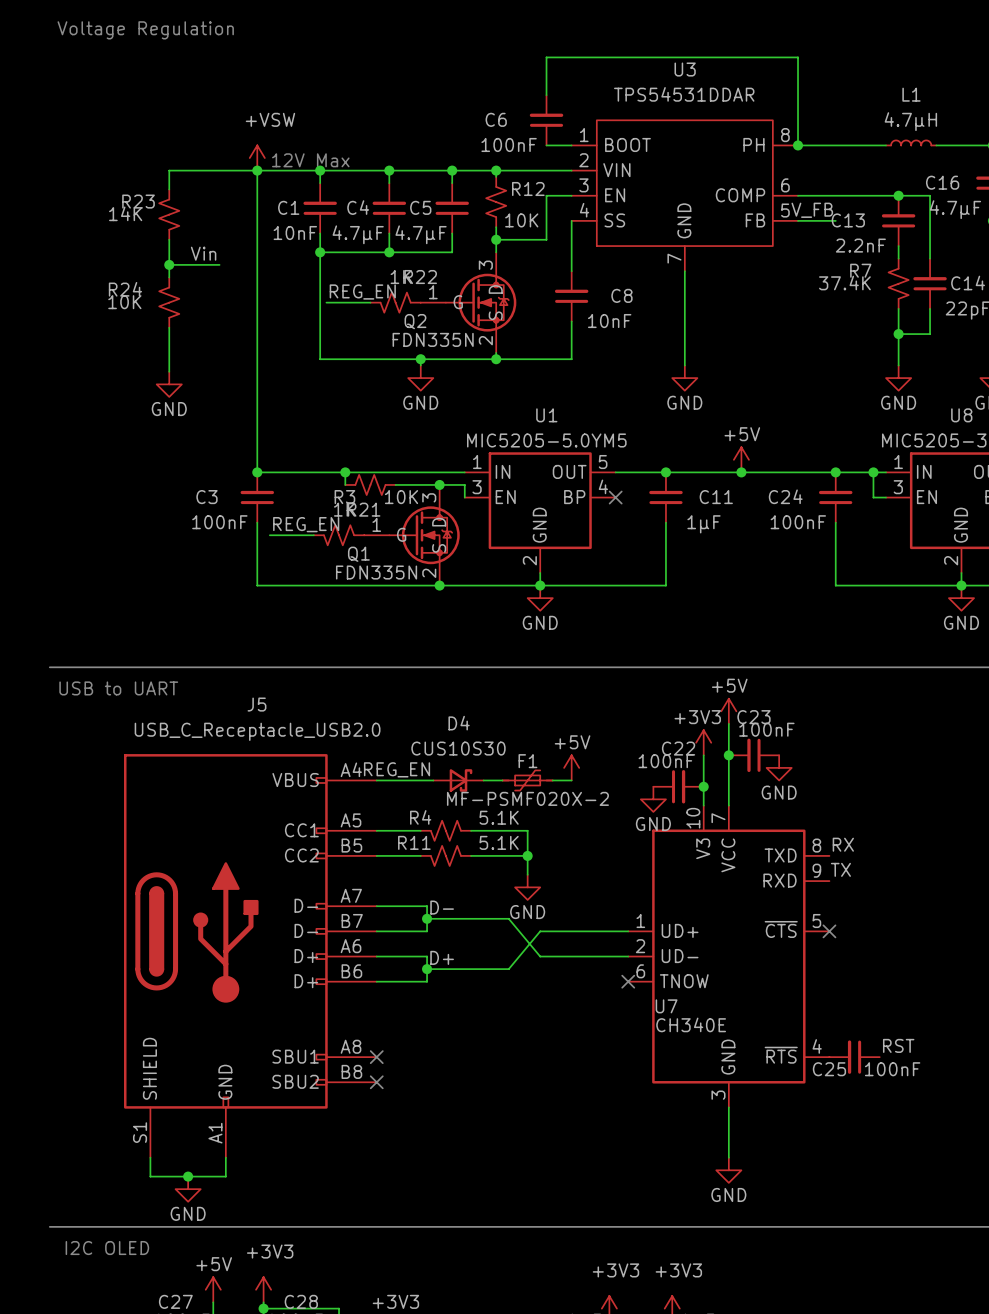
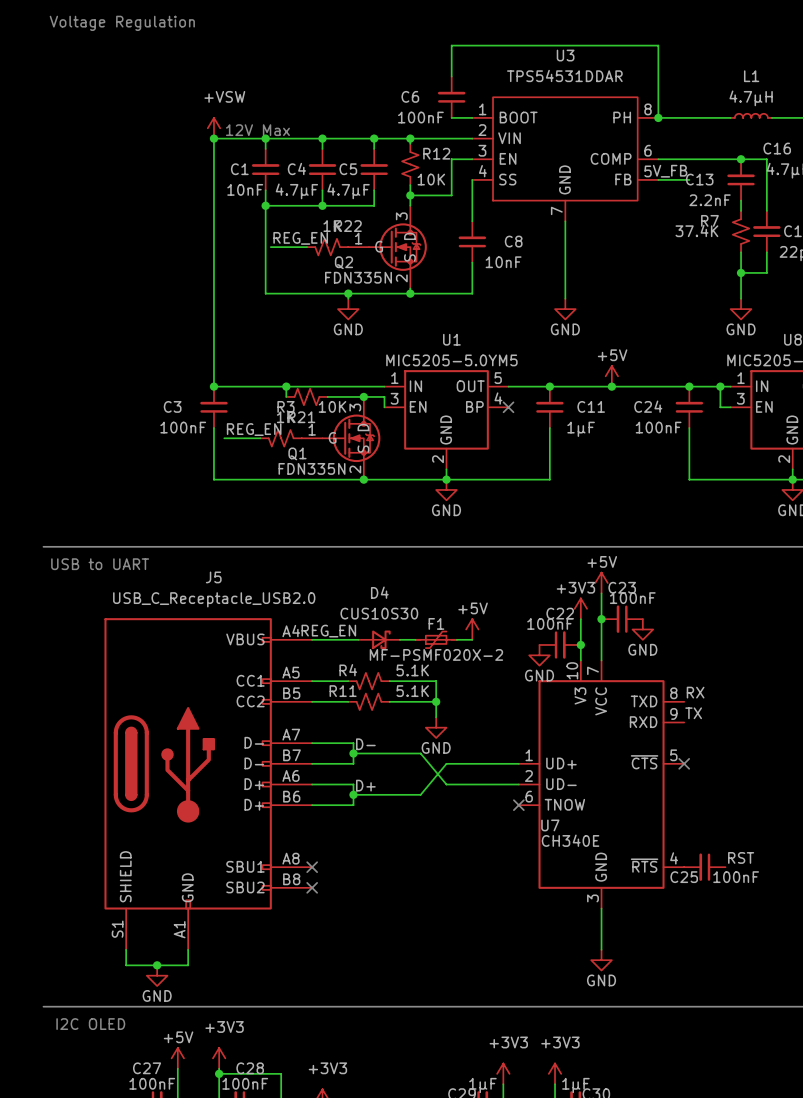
wire: (257, 170) (169, 170) (169, 189) -> none
R23: 14K (169, 214) -> none
wire: (169, 239) (169, 277) -> none
label: Vin (203, 253) -> none
wire: (169, 264) (219, 264) -> none
junction: (169, 264) -> none
R24: 10K (169, 302) -> none
wire: (169, 327) (169, 371) -> none
power symbol: GND (169, 384) -> none

